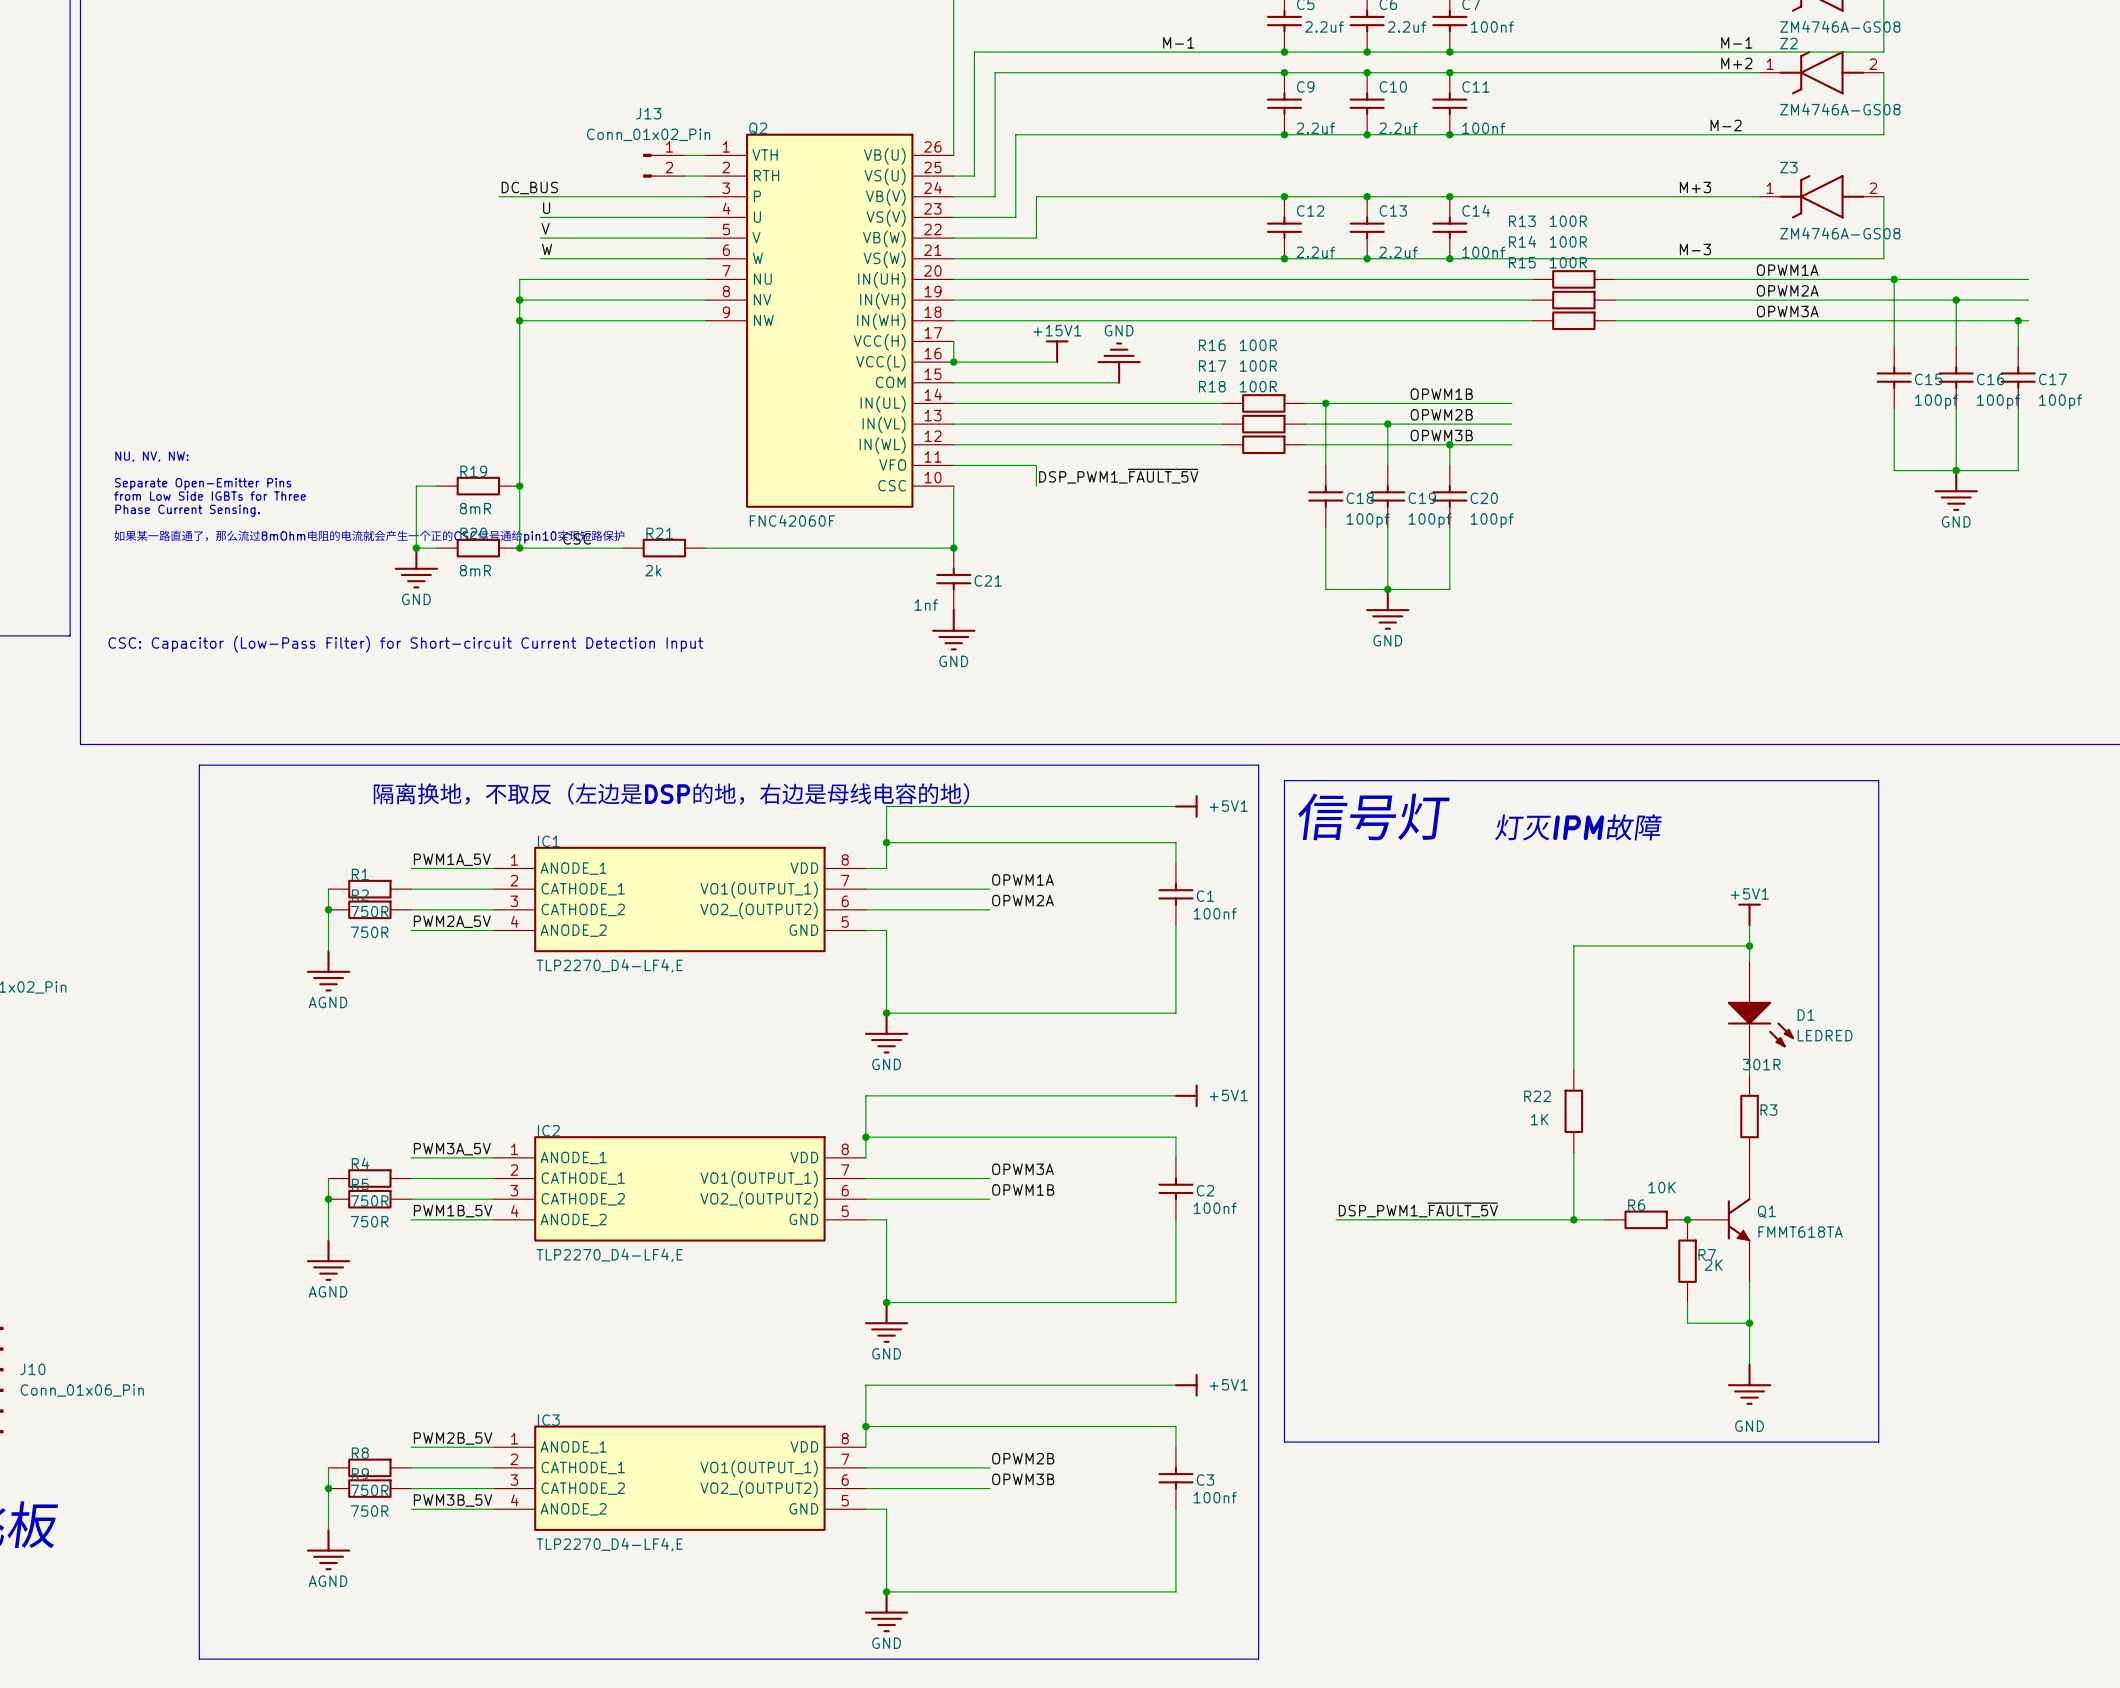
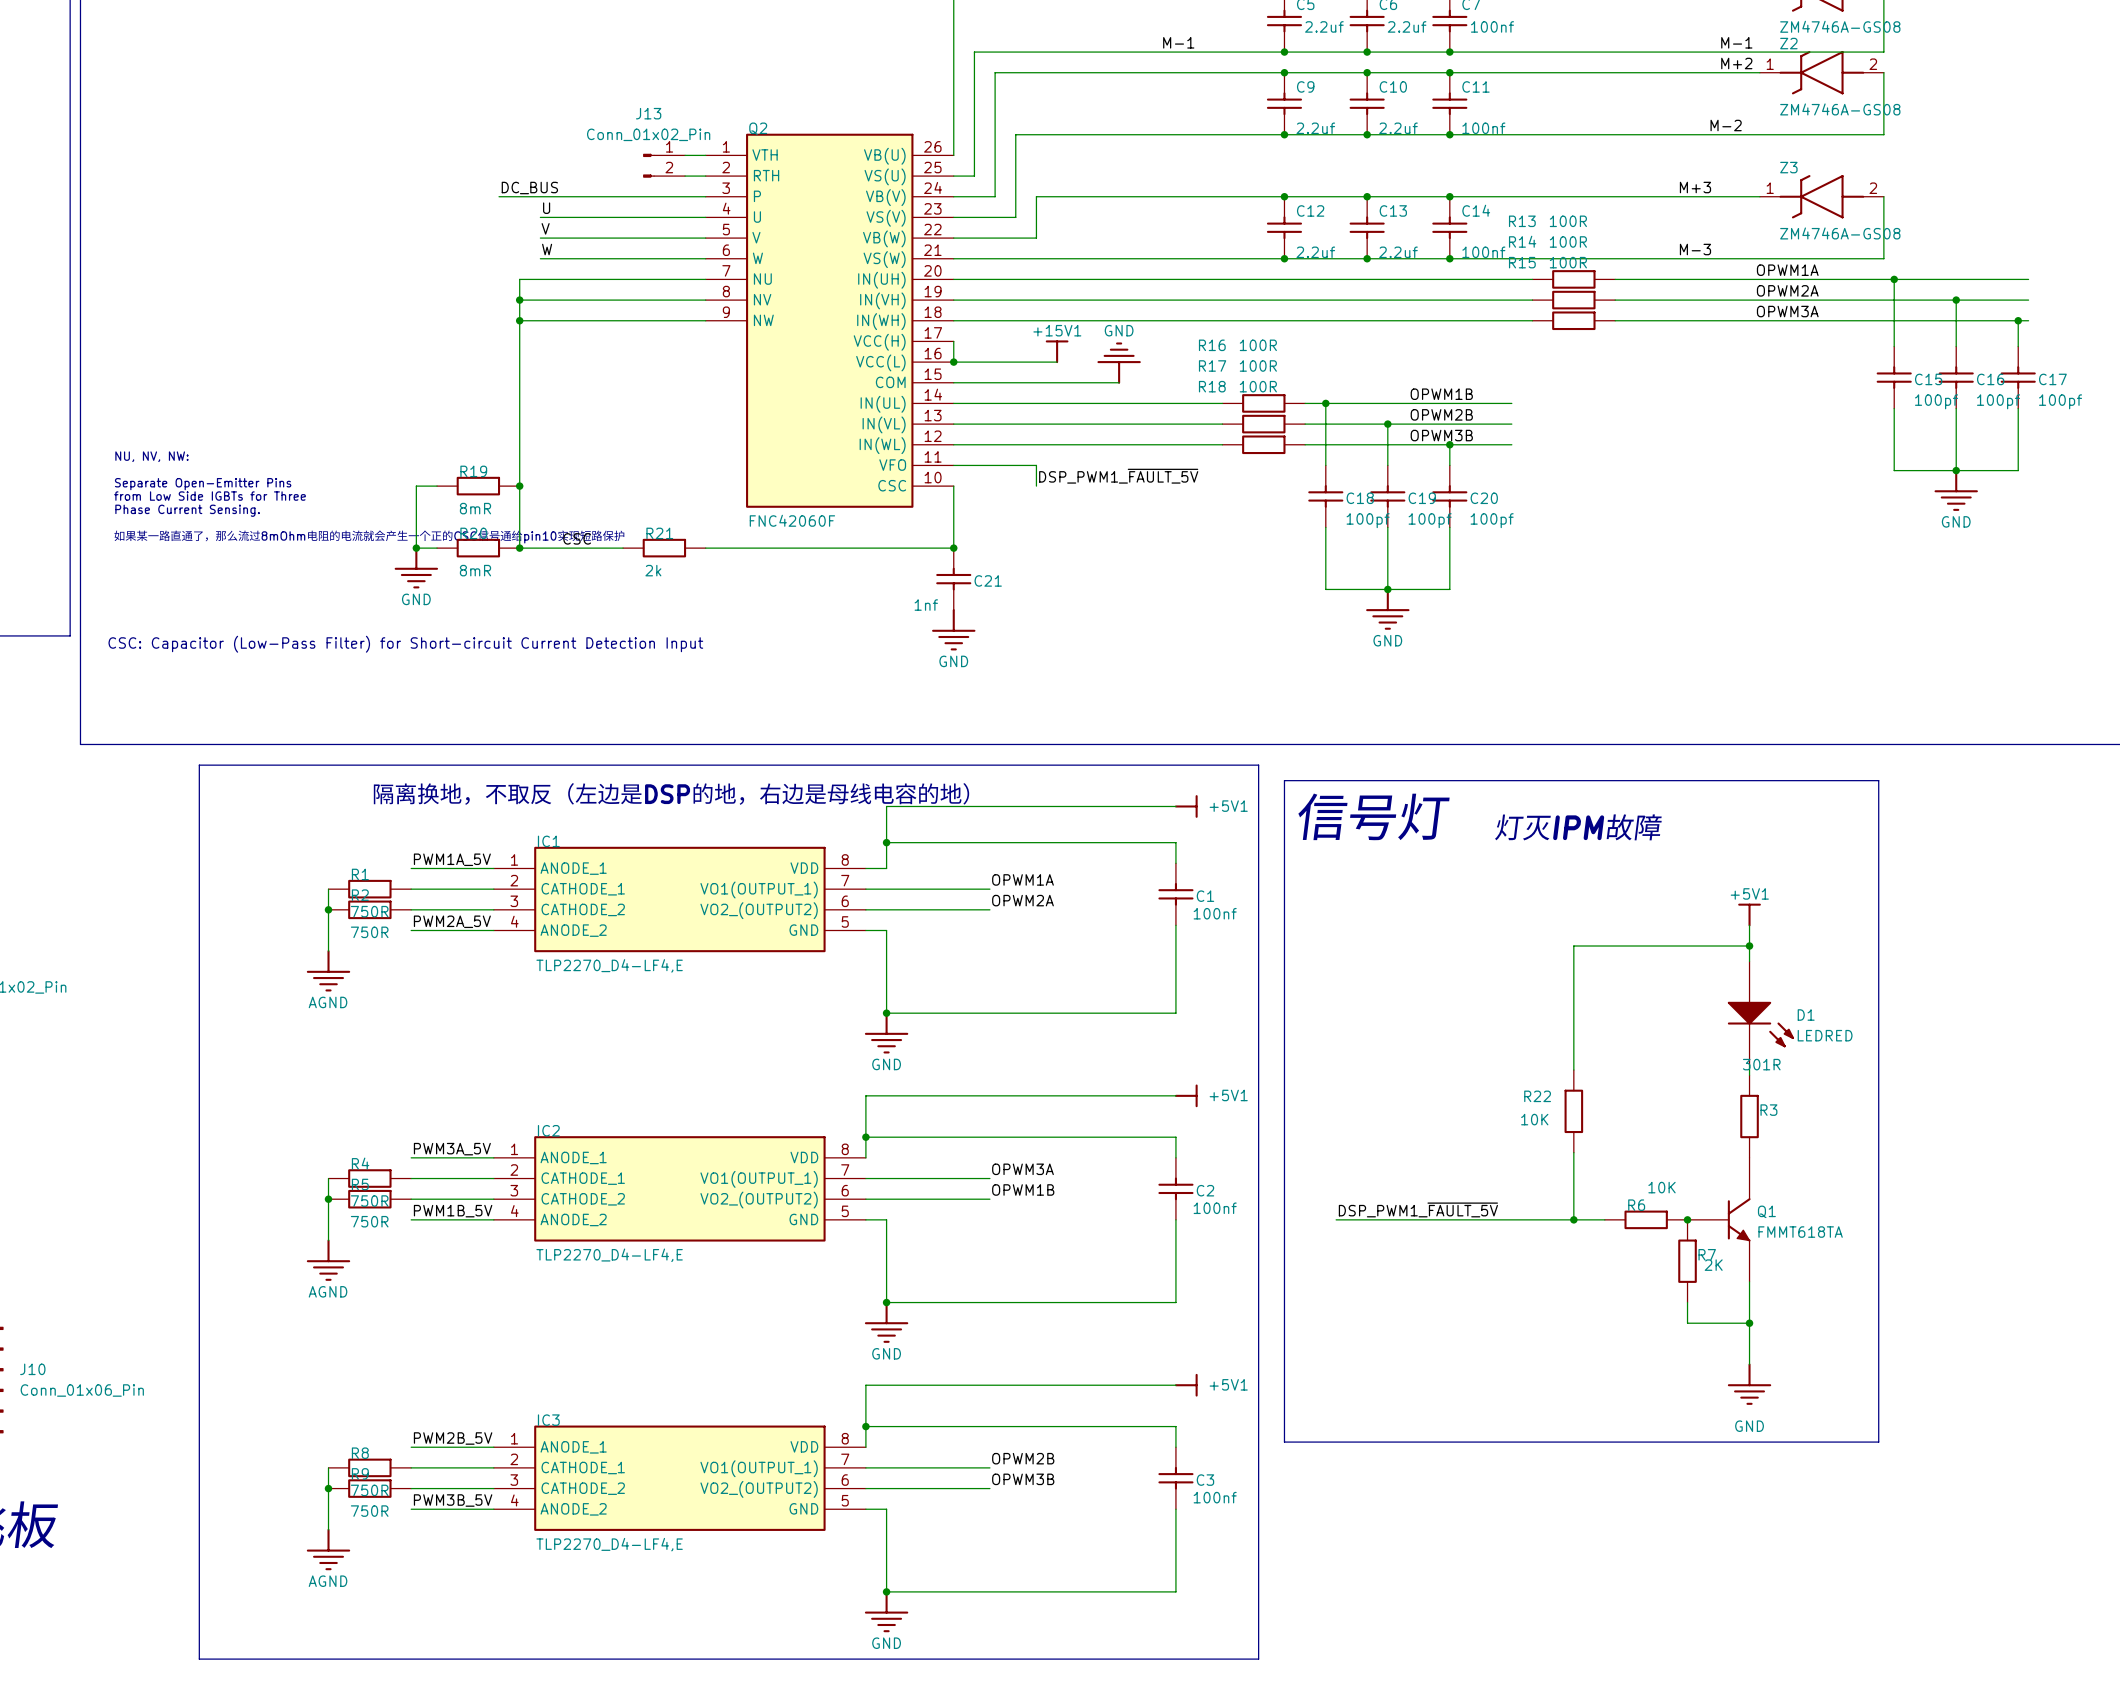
R22 value: 1K (1539, 1119) -> 10K (1534, 1119)

